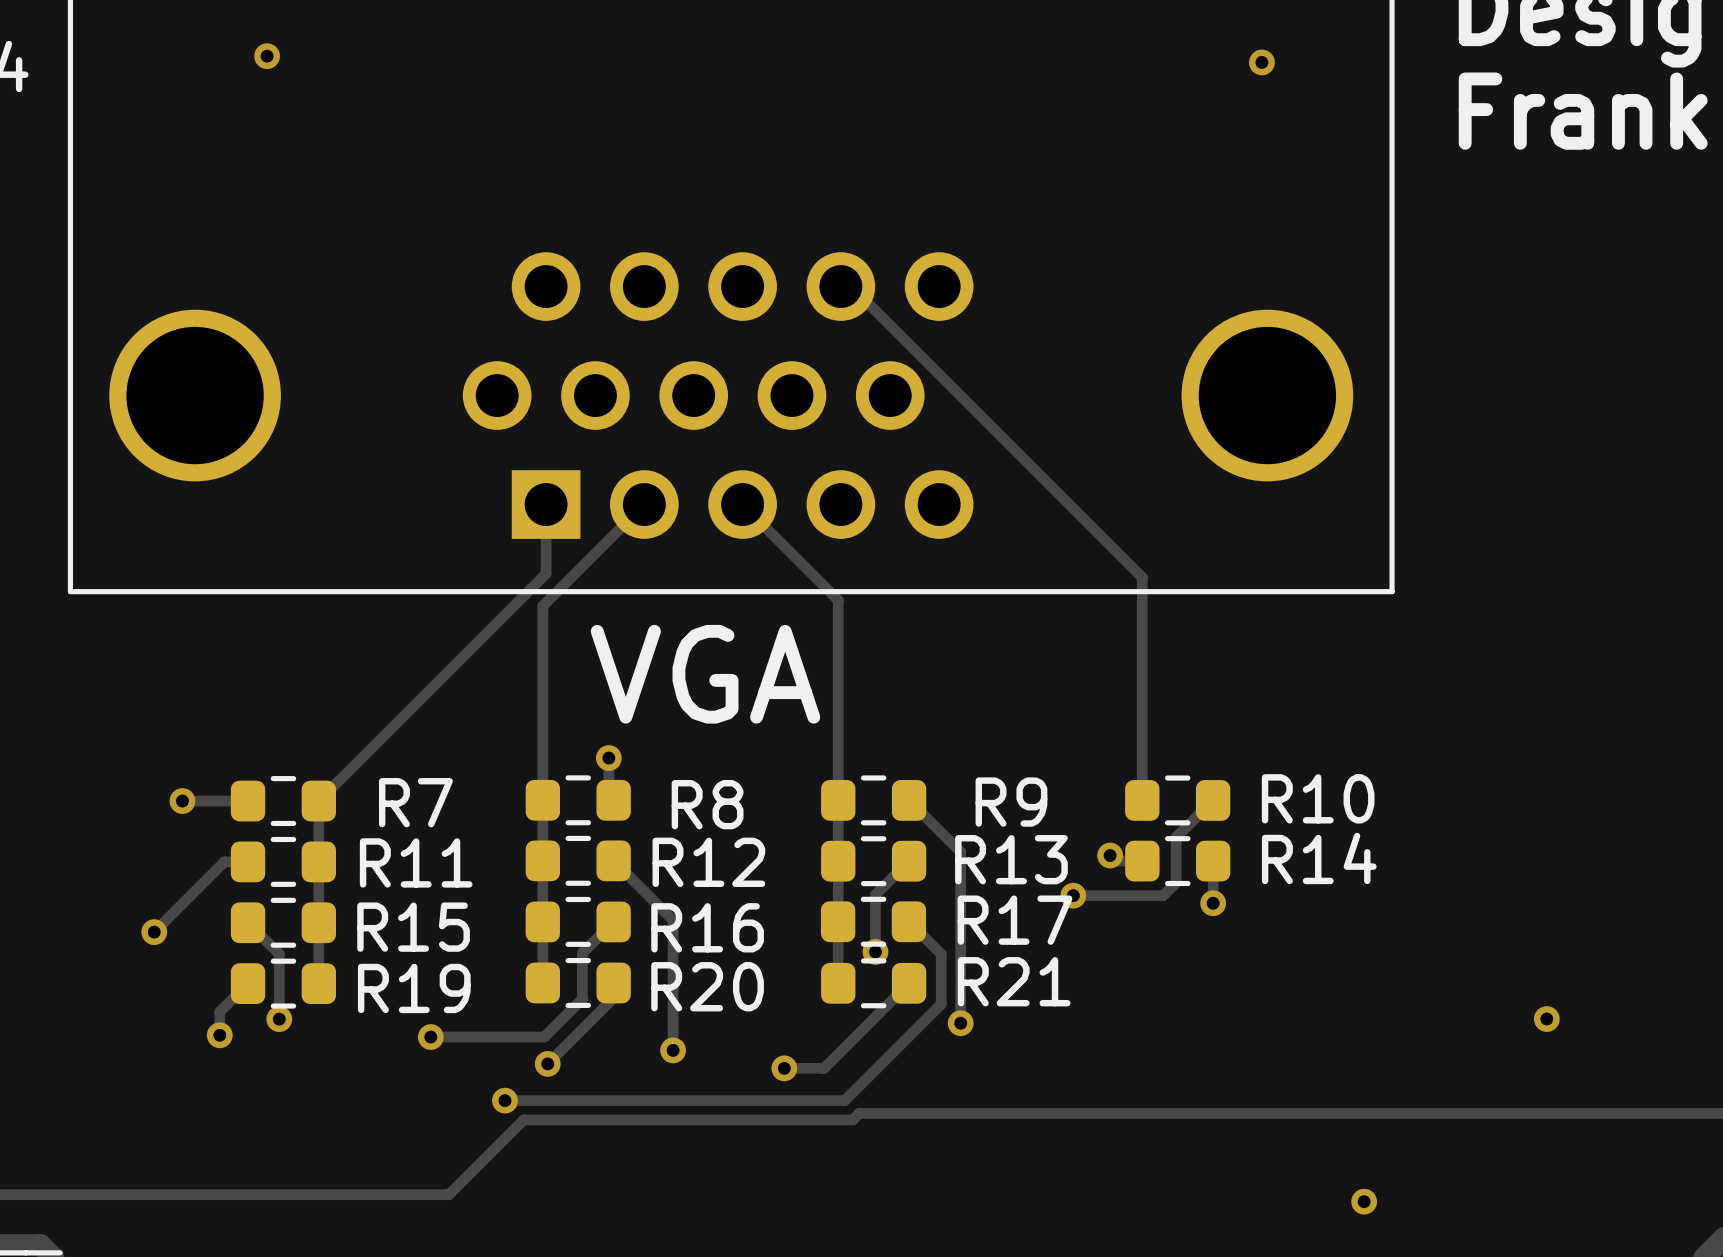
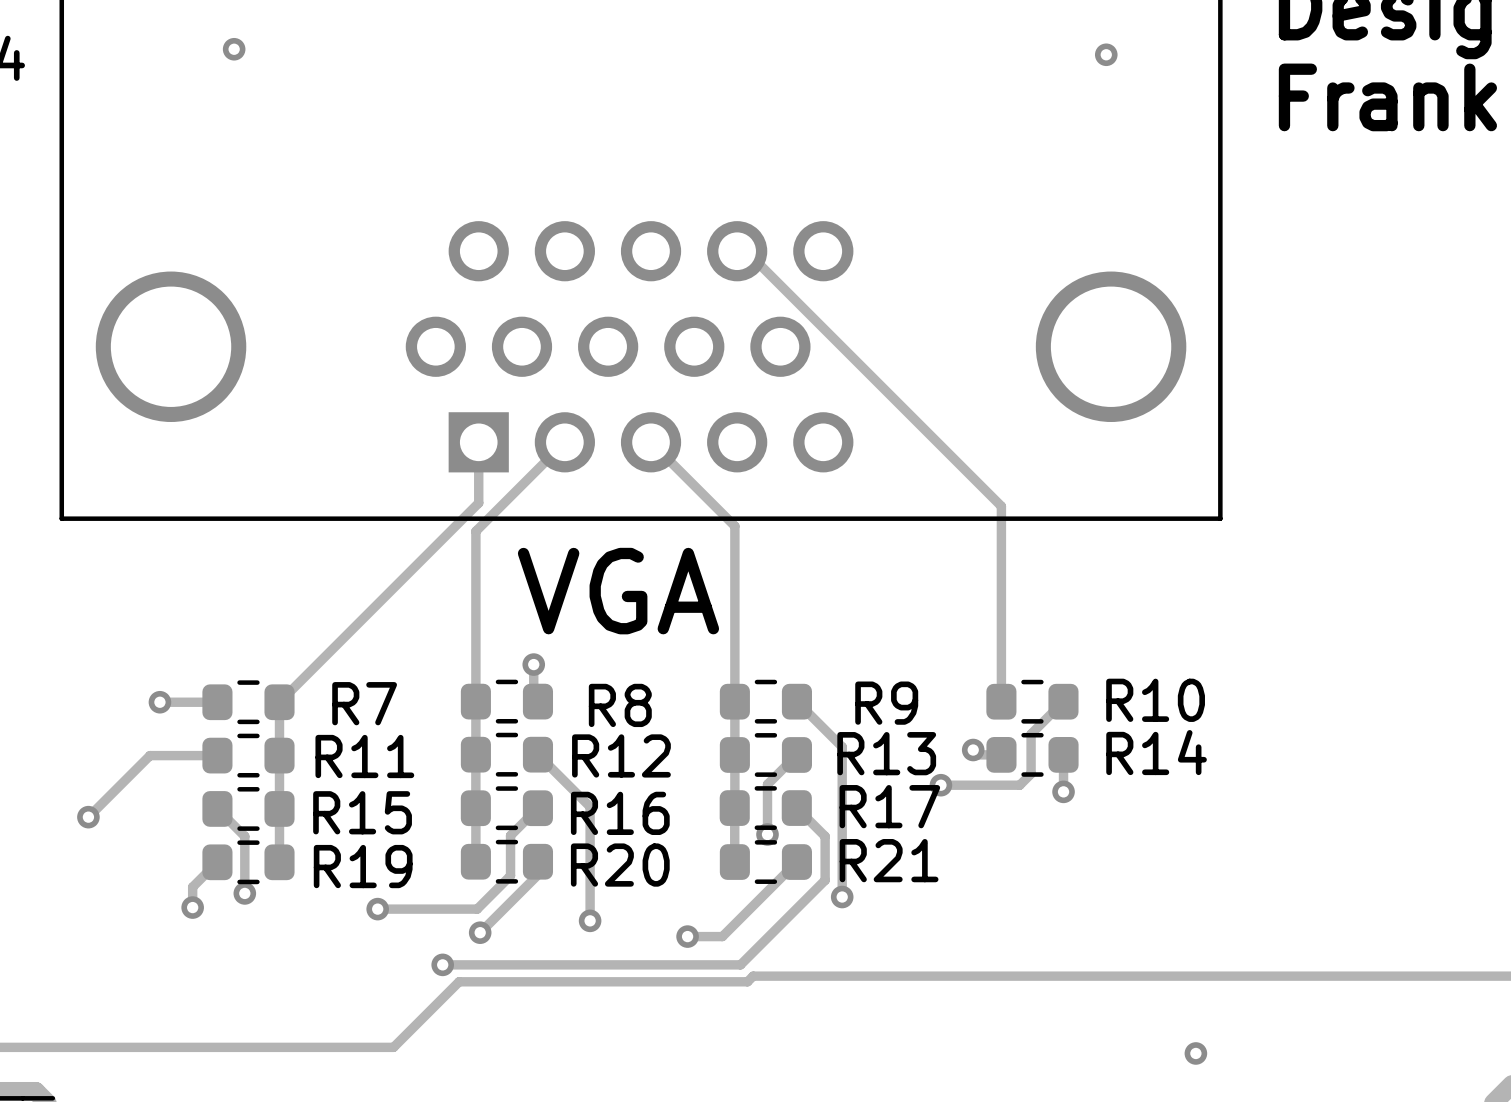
track: (224, 861) (154, 932) -> (196, 755) (149, 755) (88, 817)
via position: (154, 932) -> (88, 817)
via: (1546, 1019) -> none

